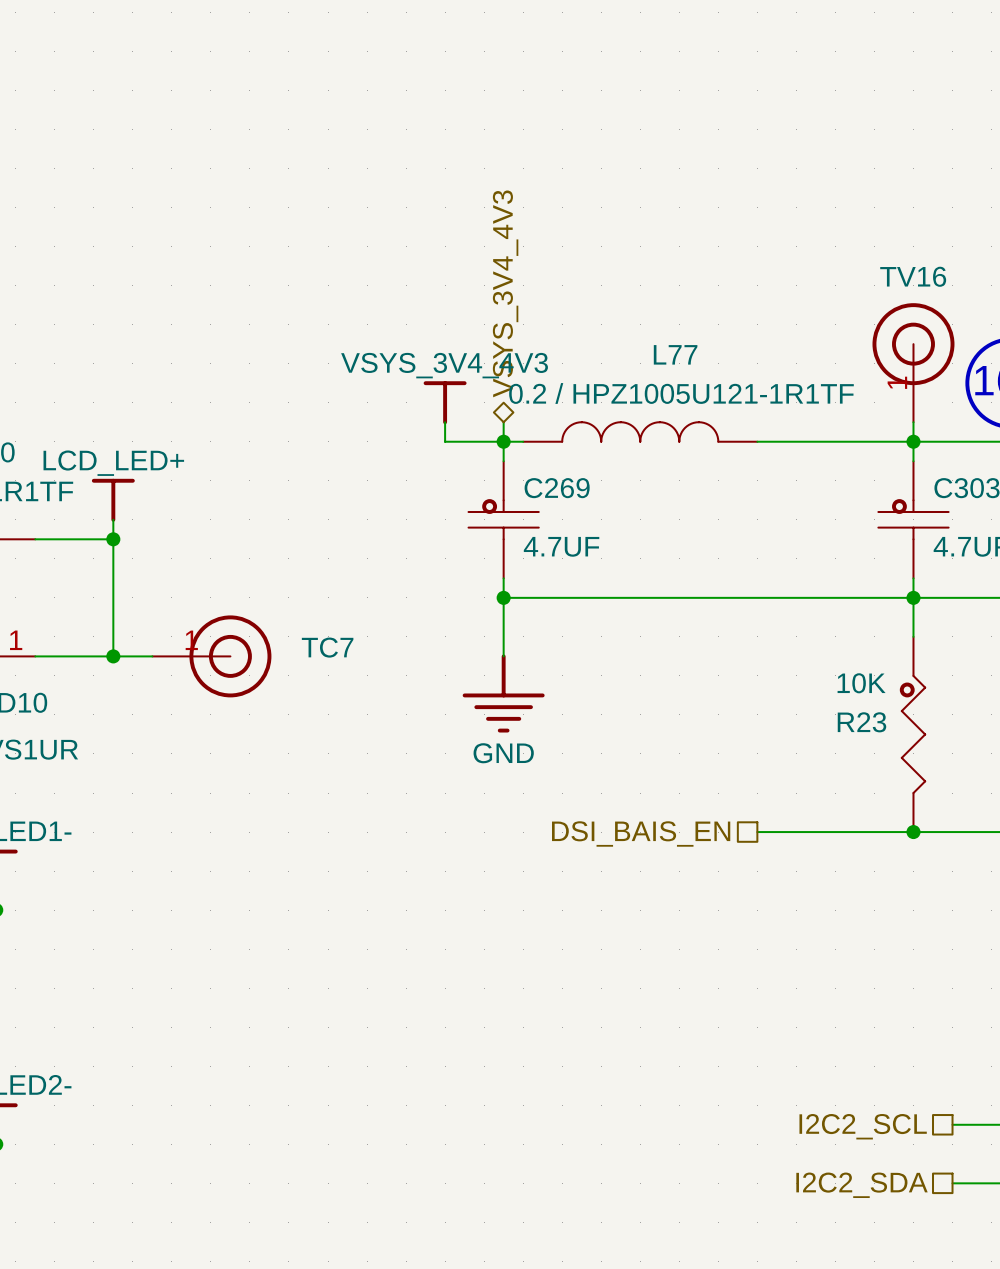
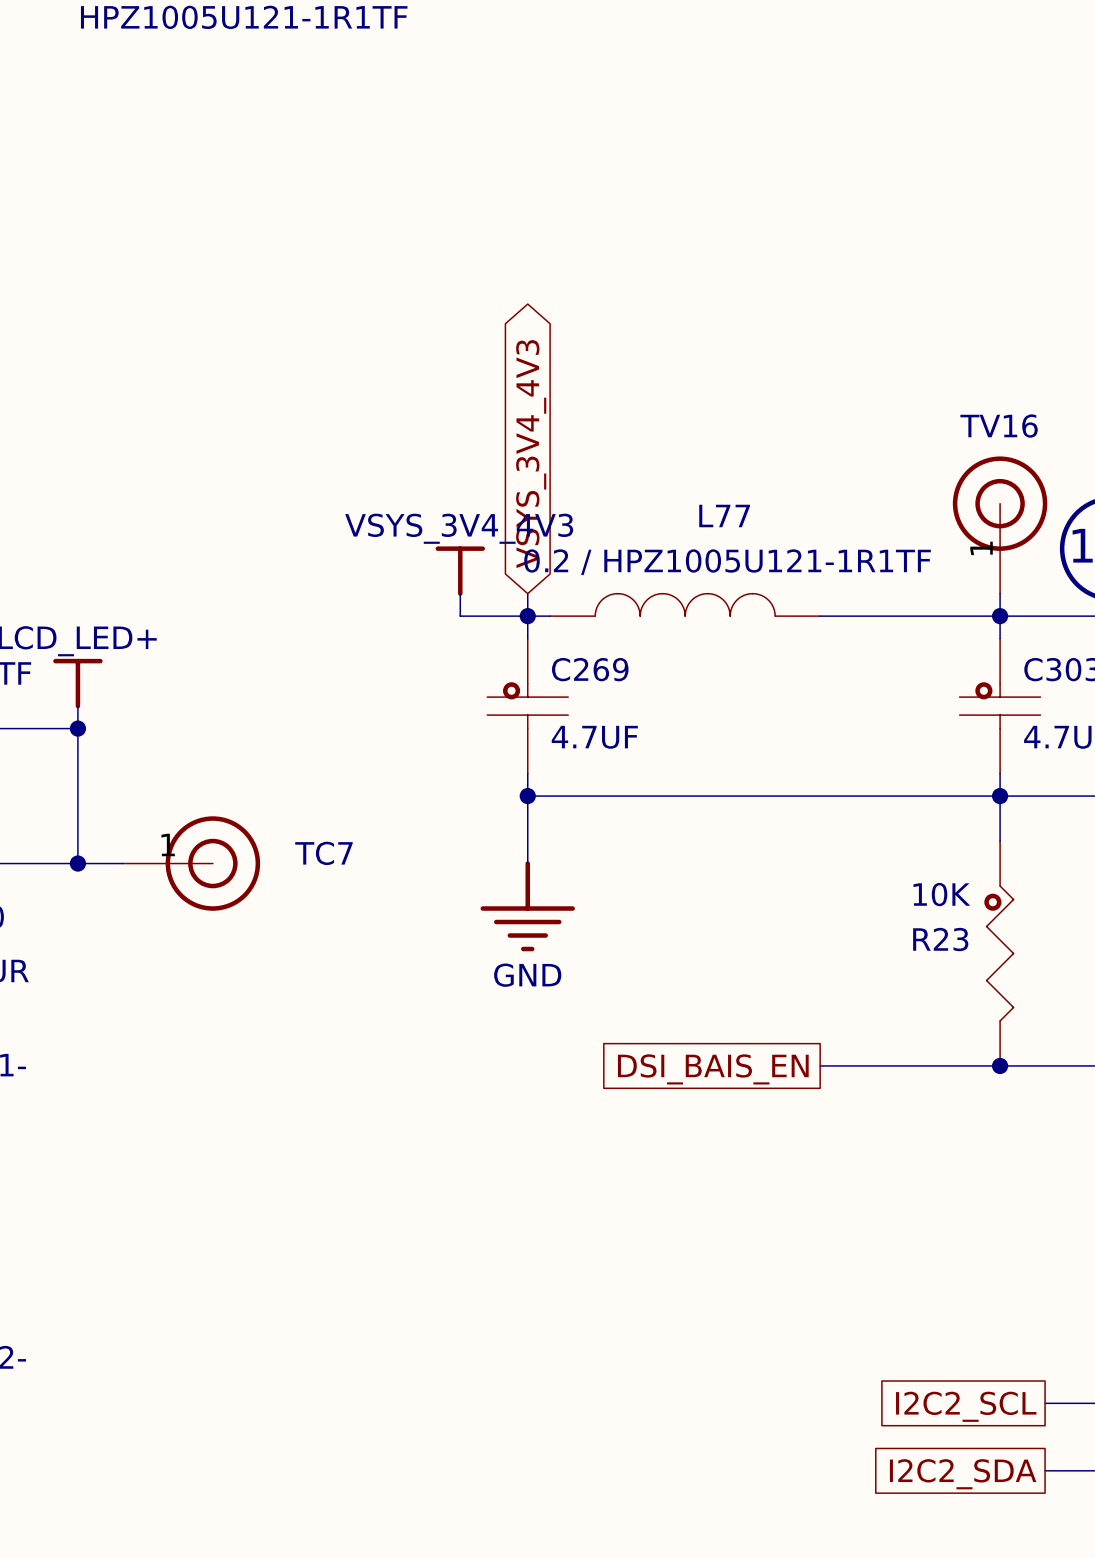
hierarchical label: VSYS_3V4_4V3 (505, 293) -> none
global label: none -> VSYS_3V4_4V3 (531, 454)
hierarchical label: DSI_BAIS_EN (641, 833) -> none
global label: none -> DSI_BAIS_EN (713, 1069)
hierarchical label: I2C2_SCL (863, 1126) -> none
global label: none -> I2C2_SCL (966, 1406)
hierarchical label: I2C2_SDA (862, 1185) -> none
global label: none -> I2C2_SDA (963, 1474)

